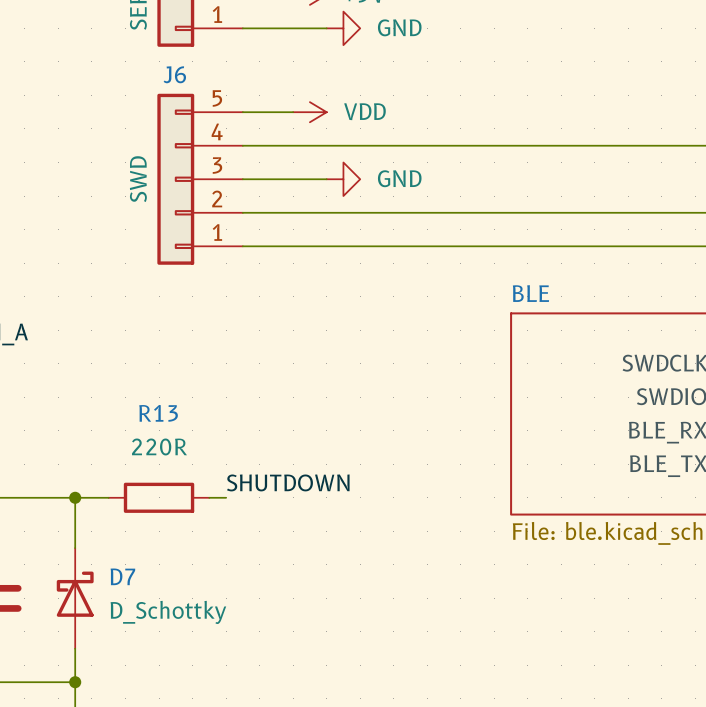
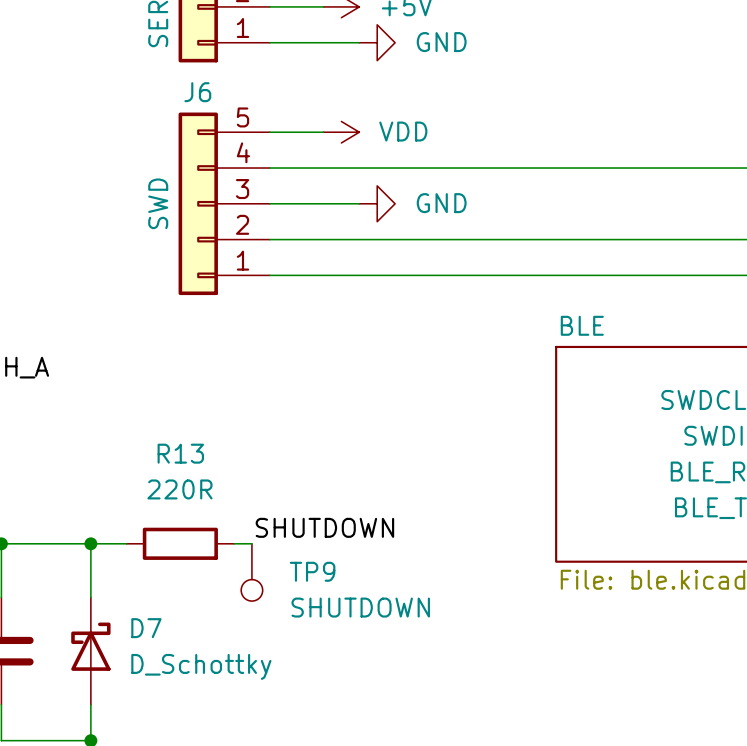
TP9: none -> SHUTDOWN (251, 572)

